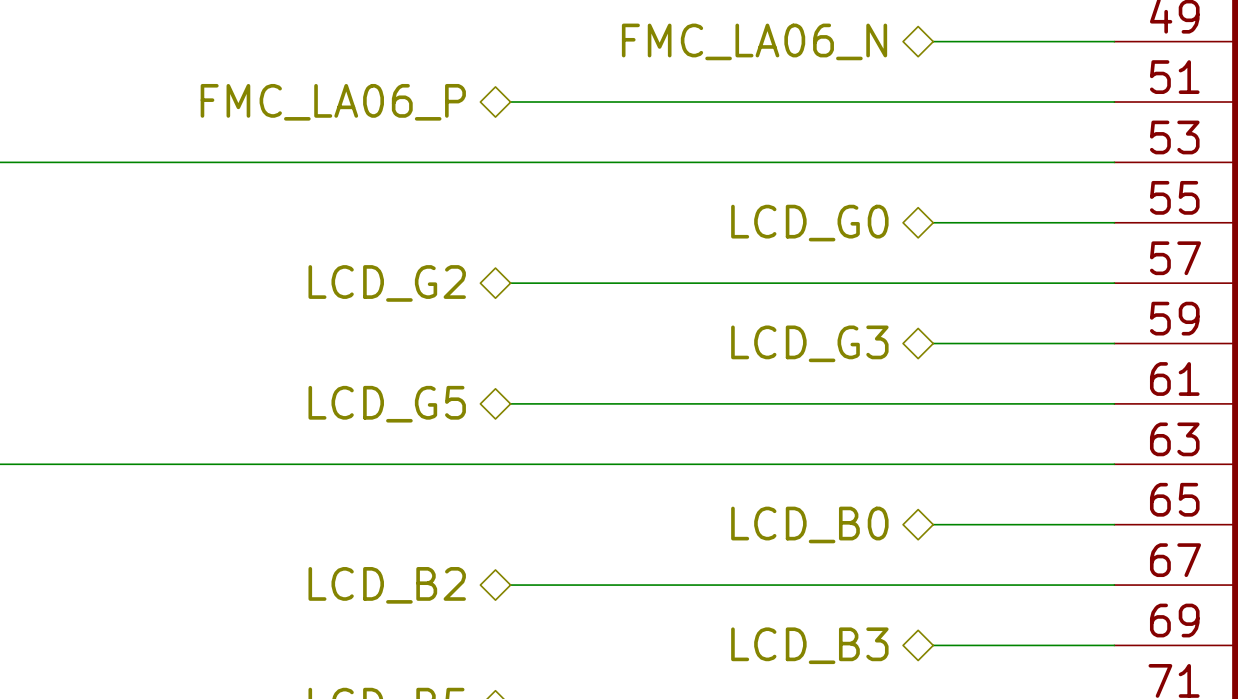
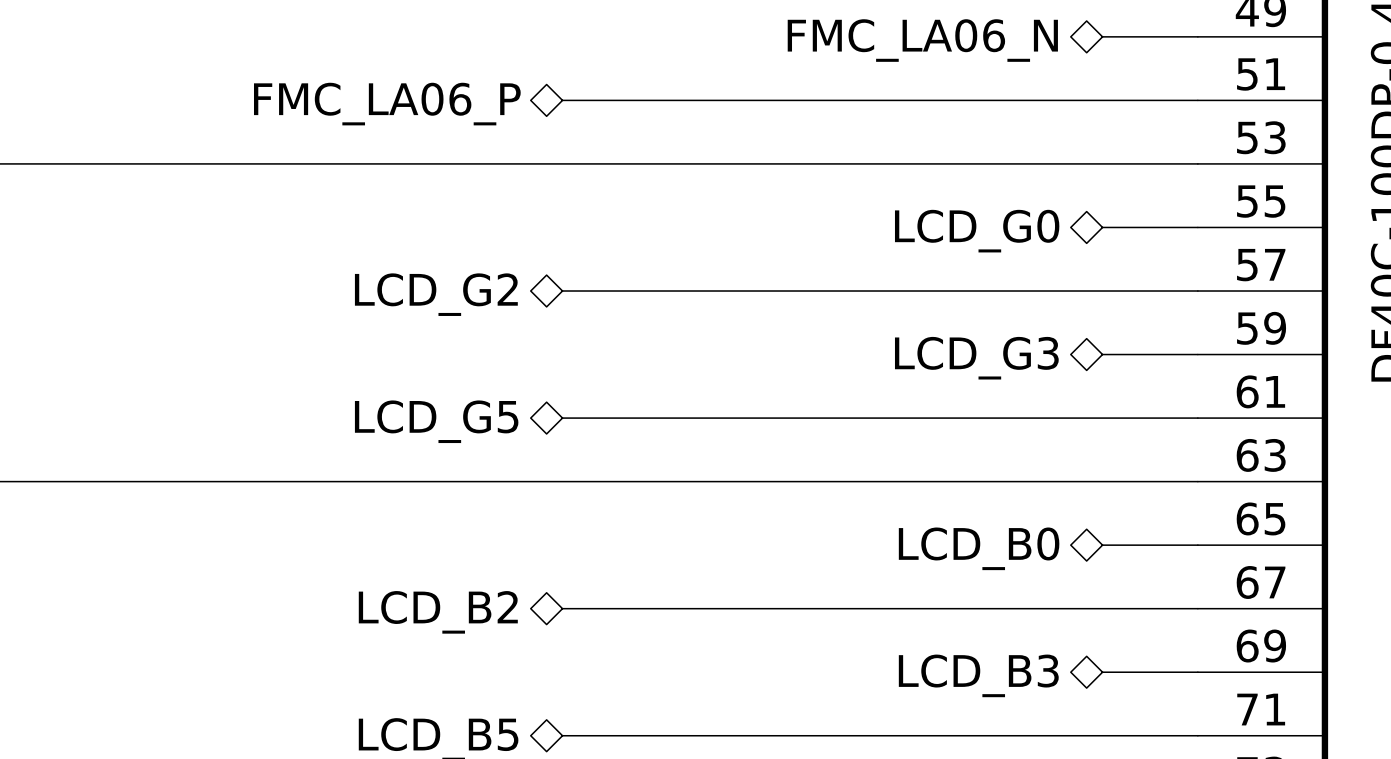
hierarchical label position: FMC_LA06_N (754, 41) -> FMC_LA06_N (922, 40)
wire: (933, 41) (1023, 41) -> none
wire: (933, 222) (1023, 222) -> none
hierarchical label position: LCD_G0 (809, 223) -> LCD_G0 (977, 231)
hierarchical label position: LCD_G3 (809, 343) -> LCD_G3 (976, 358)
wire: (933, 343) (1023, 343) -> none
hierarchical label position: LCD_B0 (809, 524) -> LCD_B0 (979, 548)
wire: (933, 524) (1023, 524) -> none
hierarchical label position: LCD_B3 (809, 645) -> LCD_B3 (978, 675)
wire: (933, 645) (1023, 645) -> none

